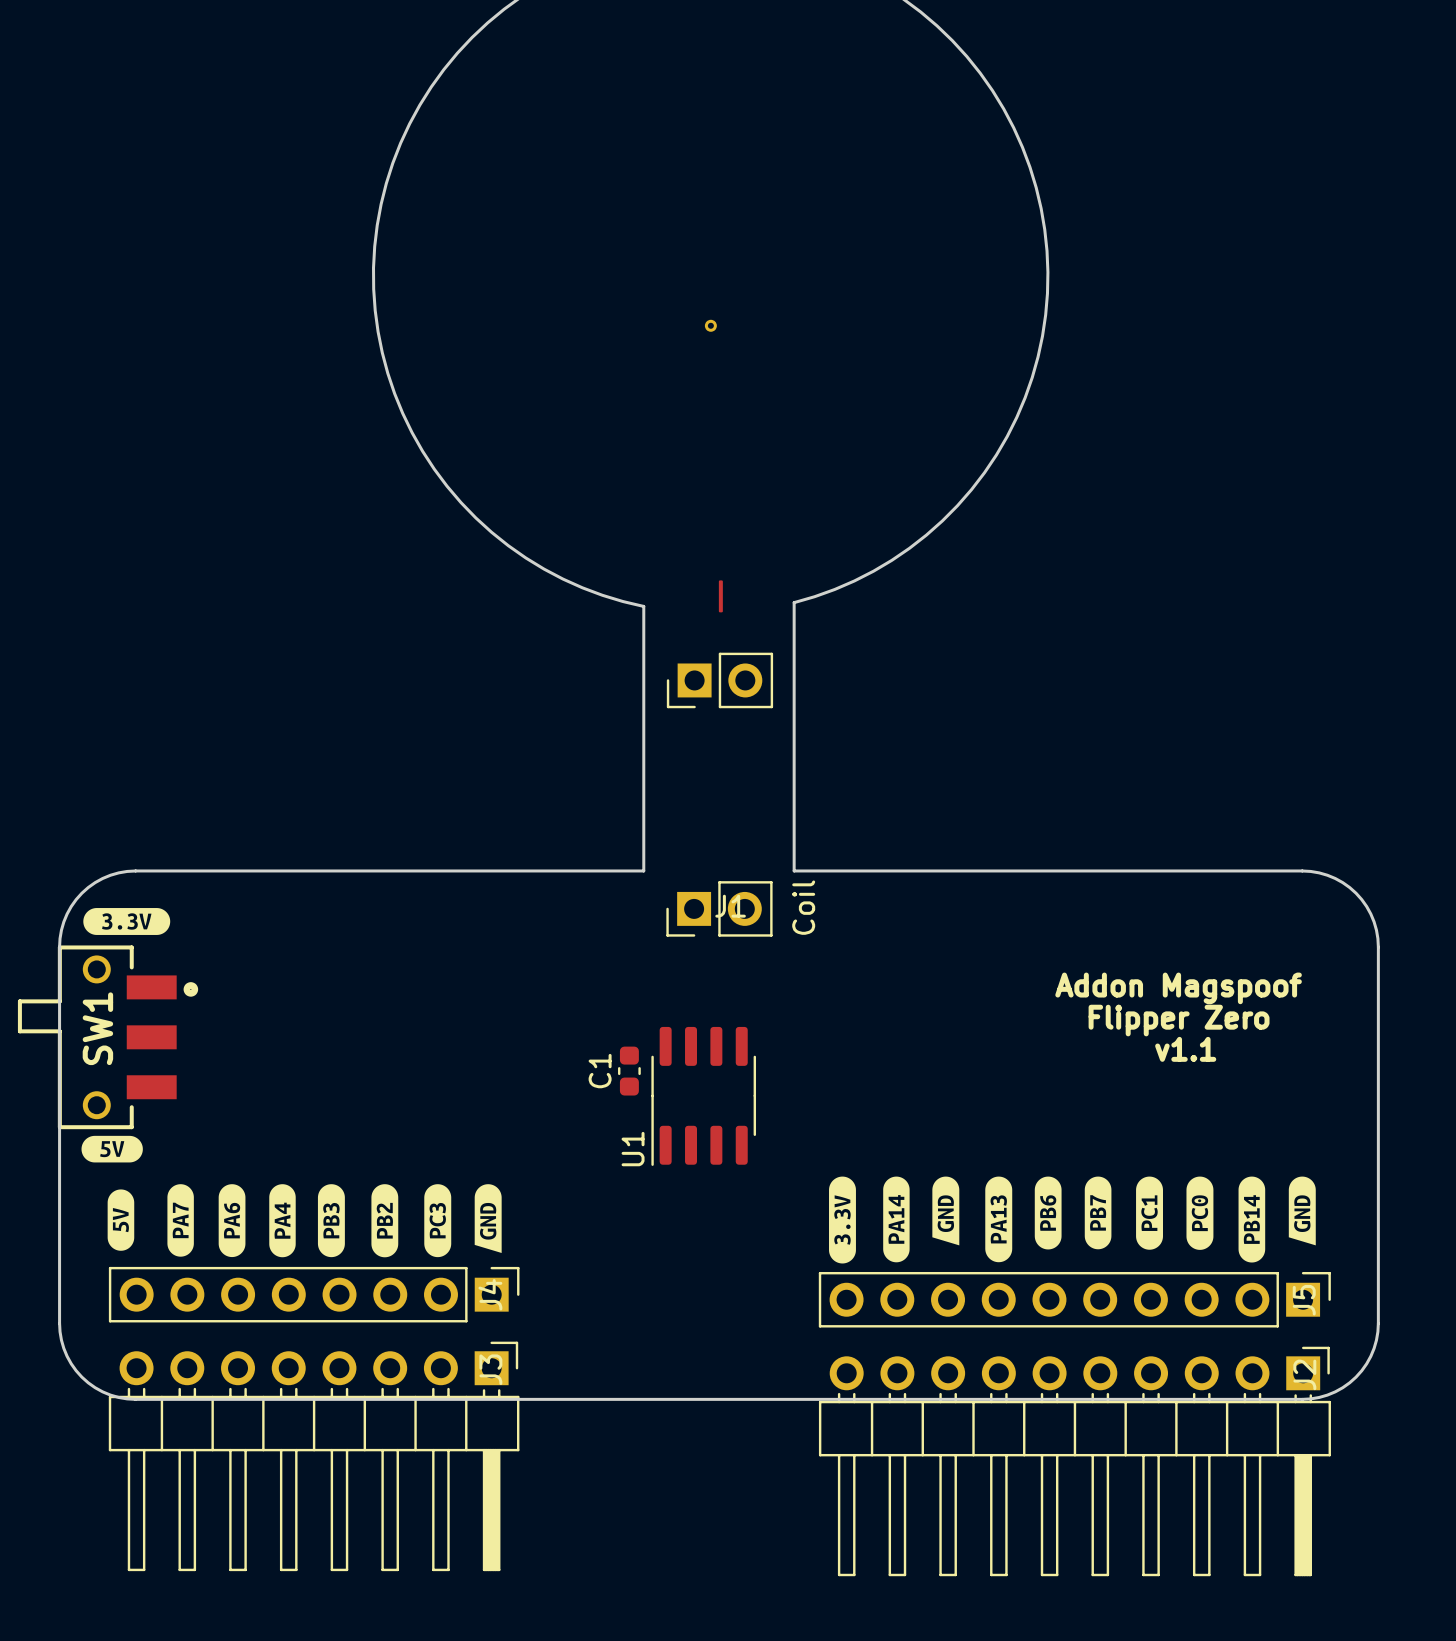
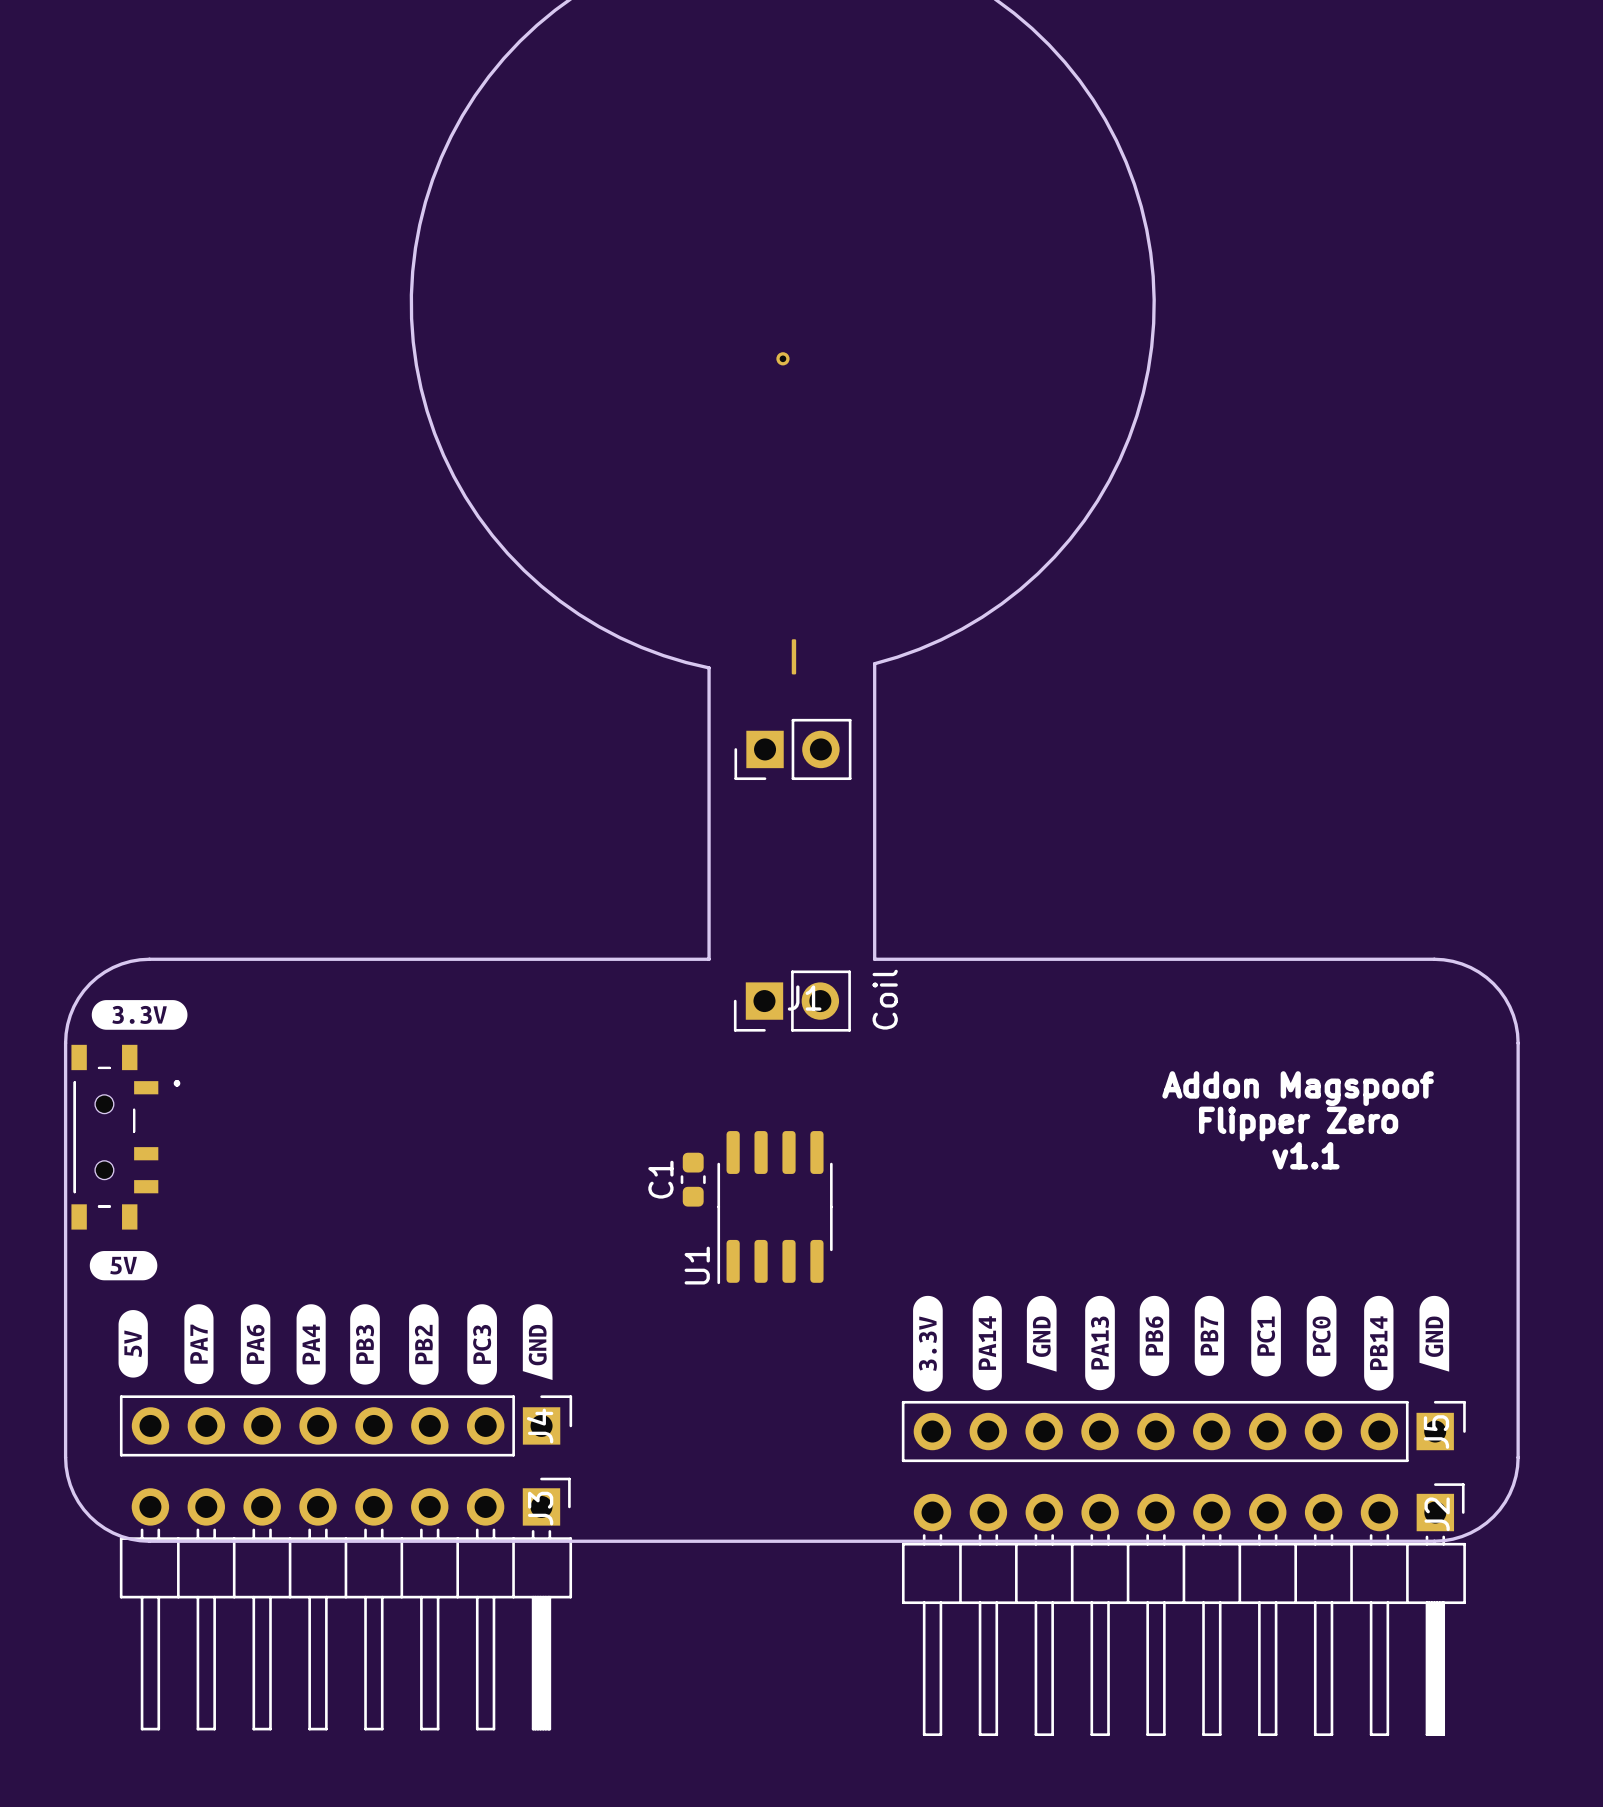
part: none -> (125, 1137)
SW1: (108, 1037) -> none

